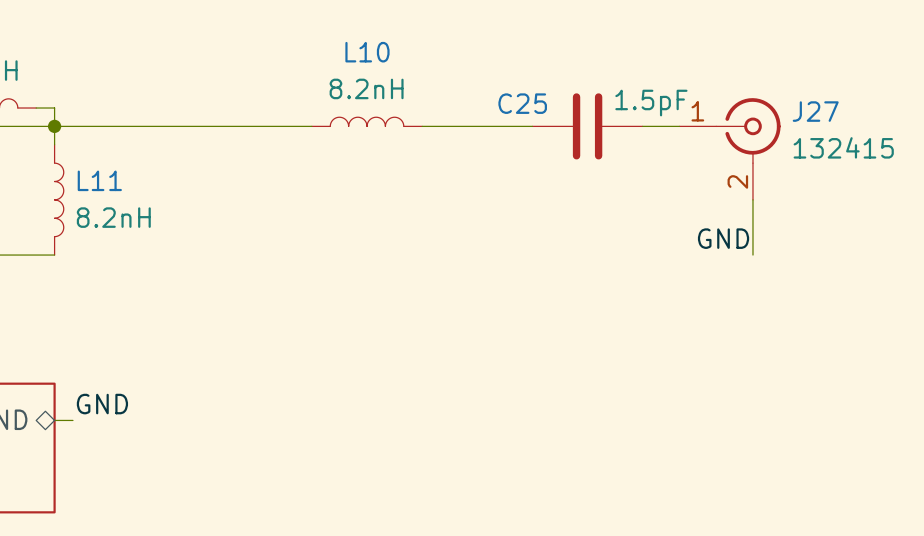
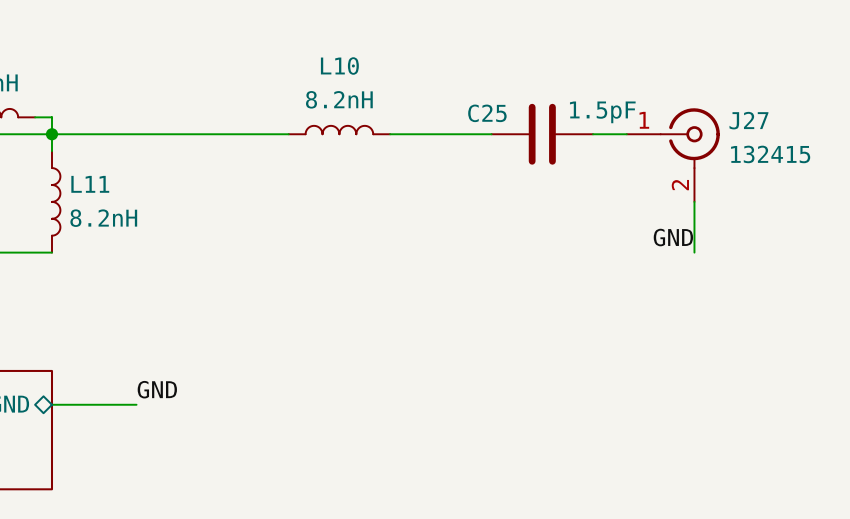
label position: GND (102, 404) -> GND (157, 389)
wire: none -> (68, 404) (136, 404)

